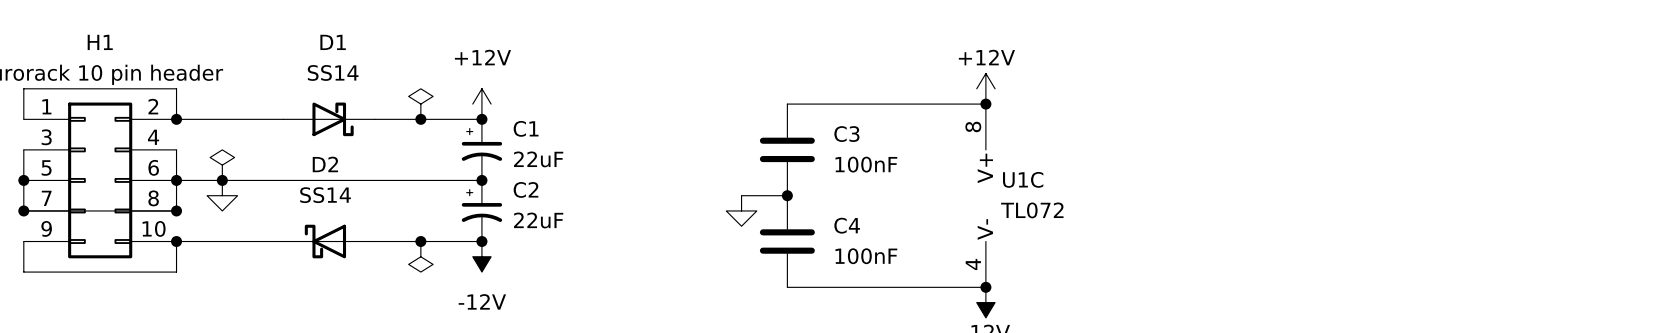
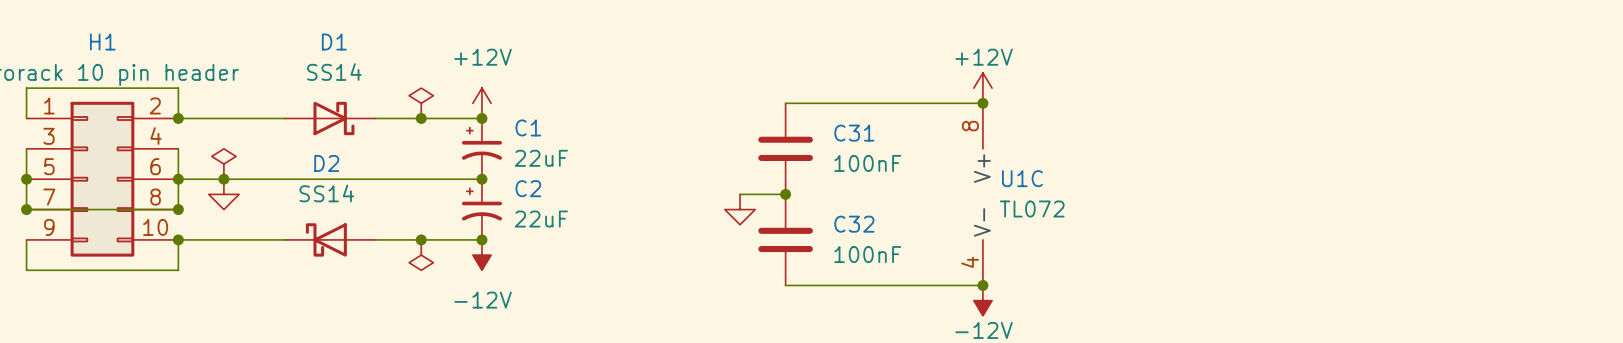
C3 name: C3 (846, 134) -> C31 (854, 133)
C4 name: C4 (847, 225) -> C32 (854, 224)

